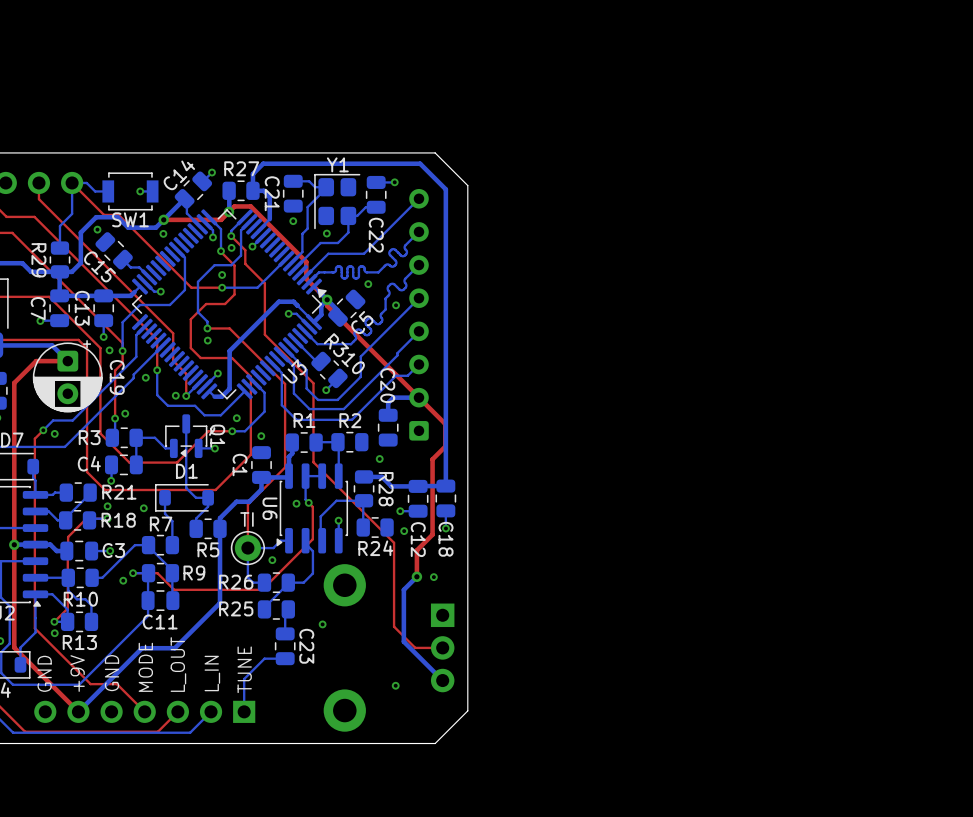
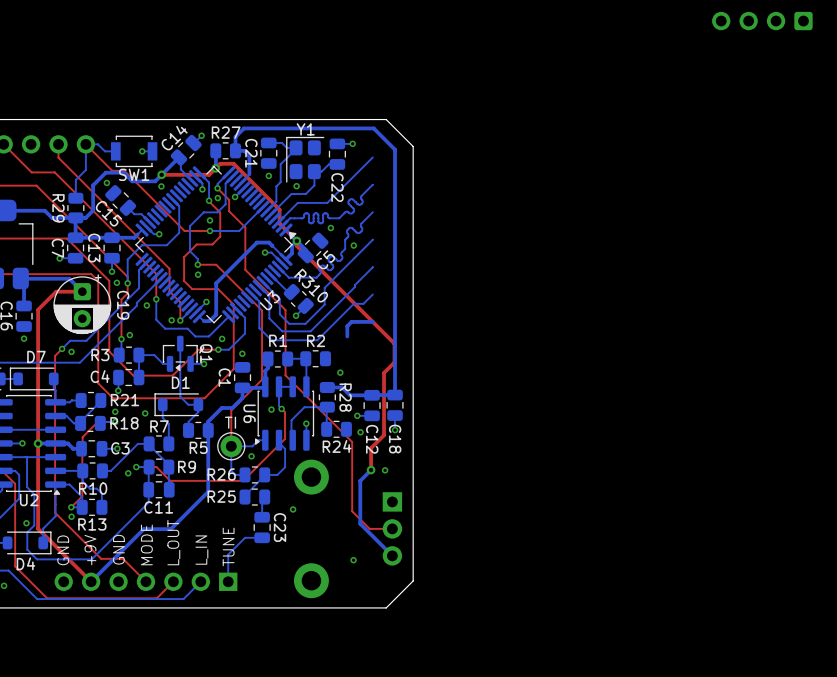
part: none -> (762, 21)
part: (419, 314) -> none
C20: (388, 427) -> none

